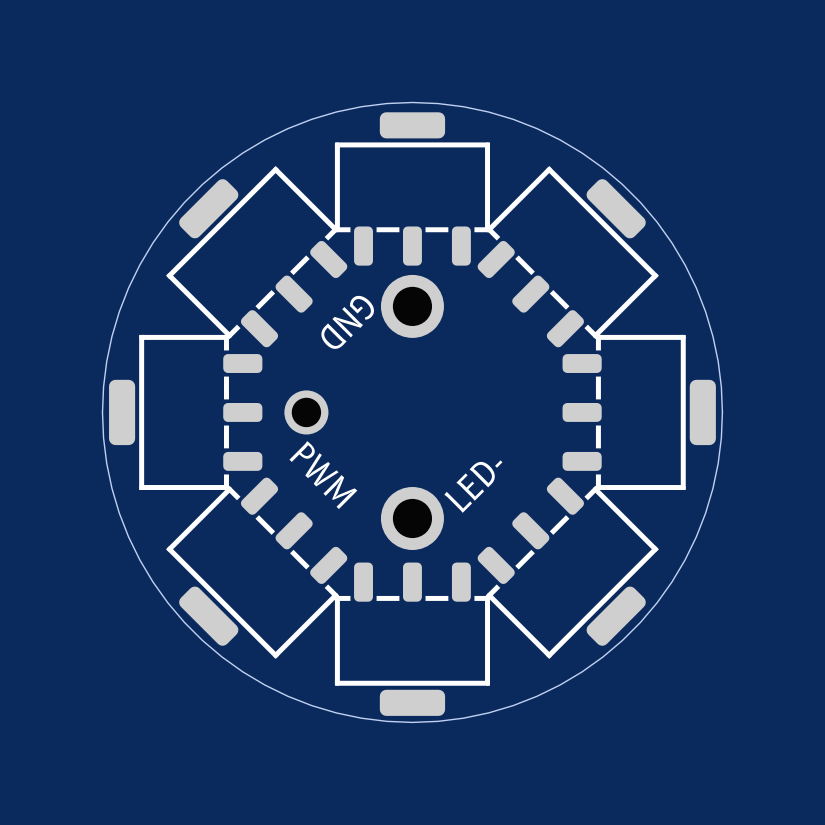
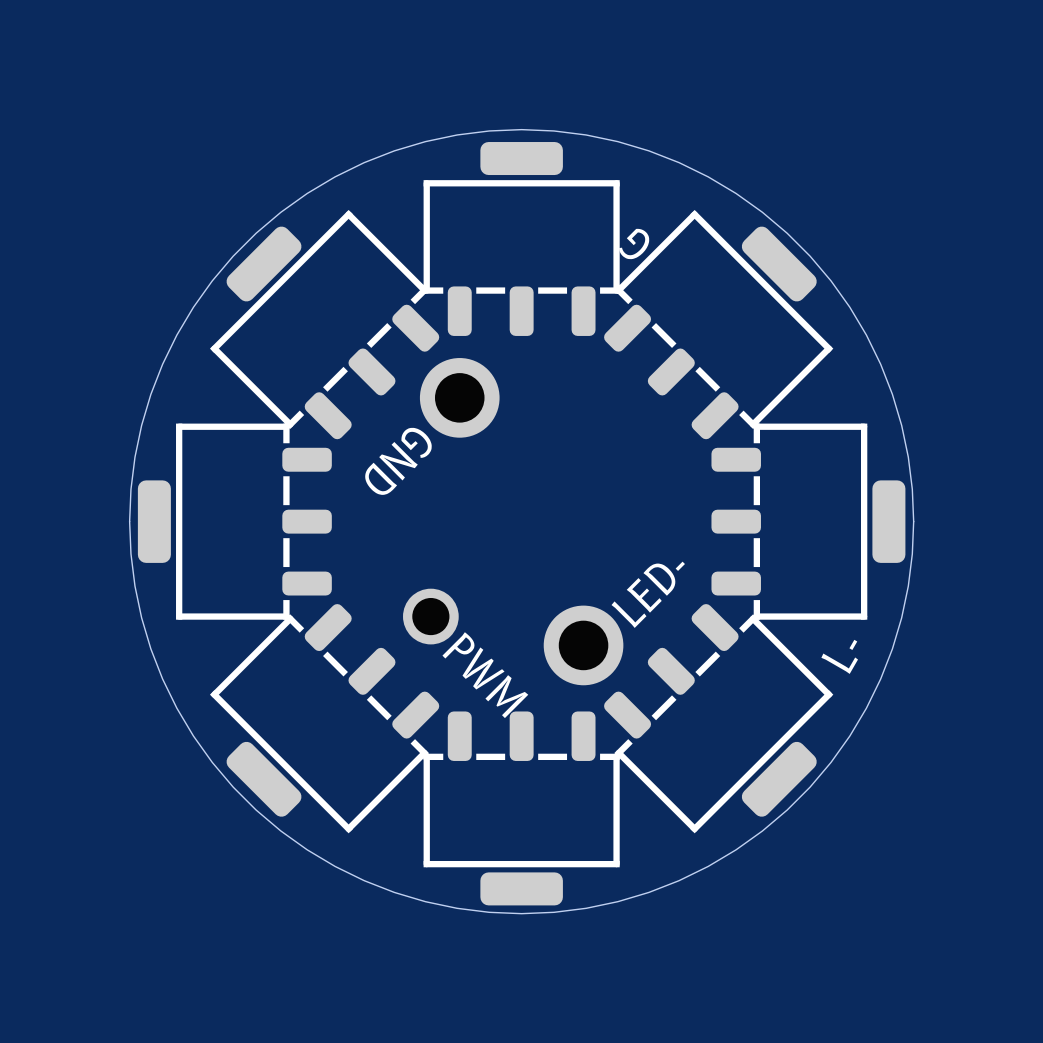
text: none -> G (634, 244)
part position: (412, 306) -> (459, 397)
text position: GND (347, 322) -> GND (398, 461)
part position: (306, 412) -> (430, 616)
text position: PWM (323, 475) -> PWM (485, 675)
text position: LED- (473, 486) -> LED- (648, 594)
part position: (412, 518) -> (583, 645)
text: none -> L- (839, 656)

